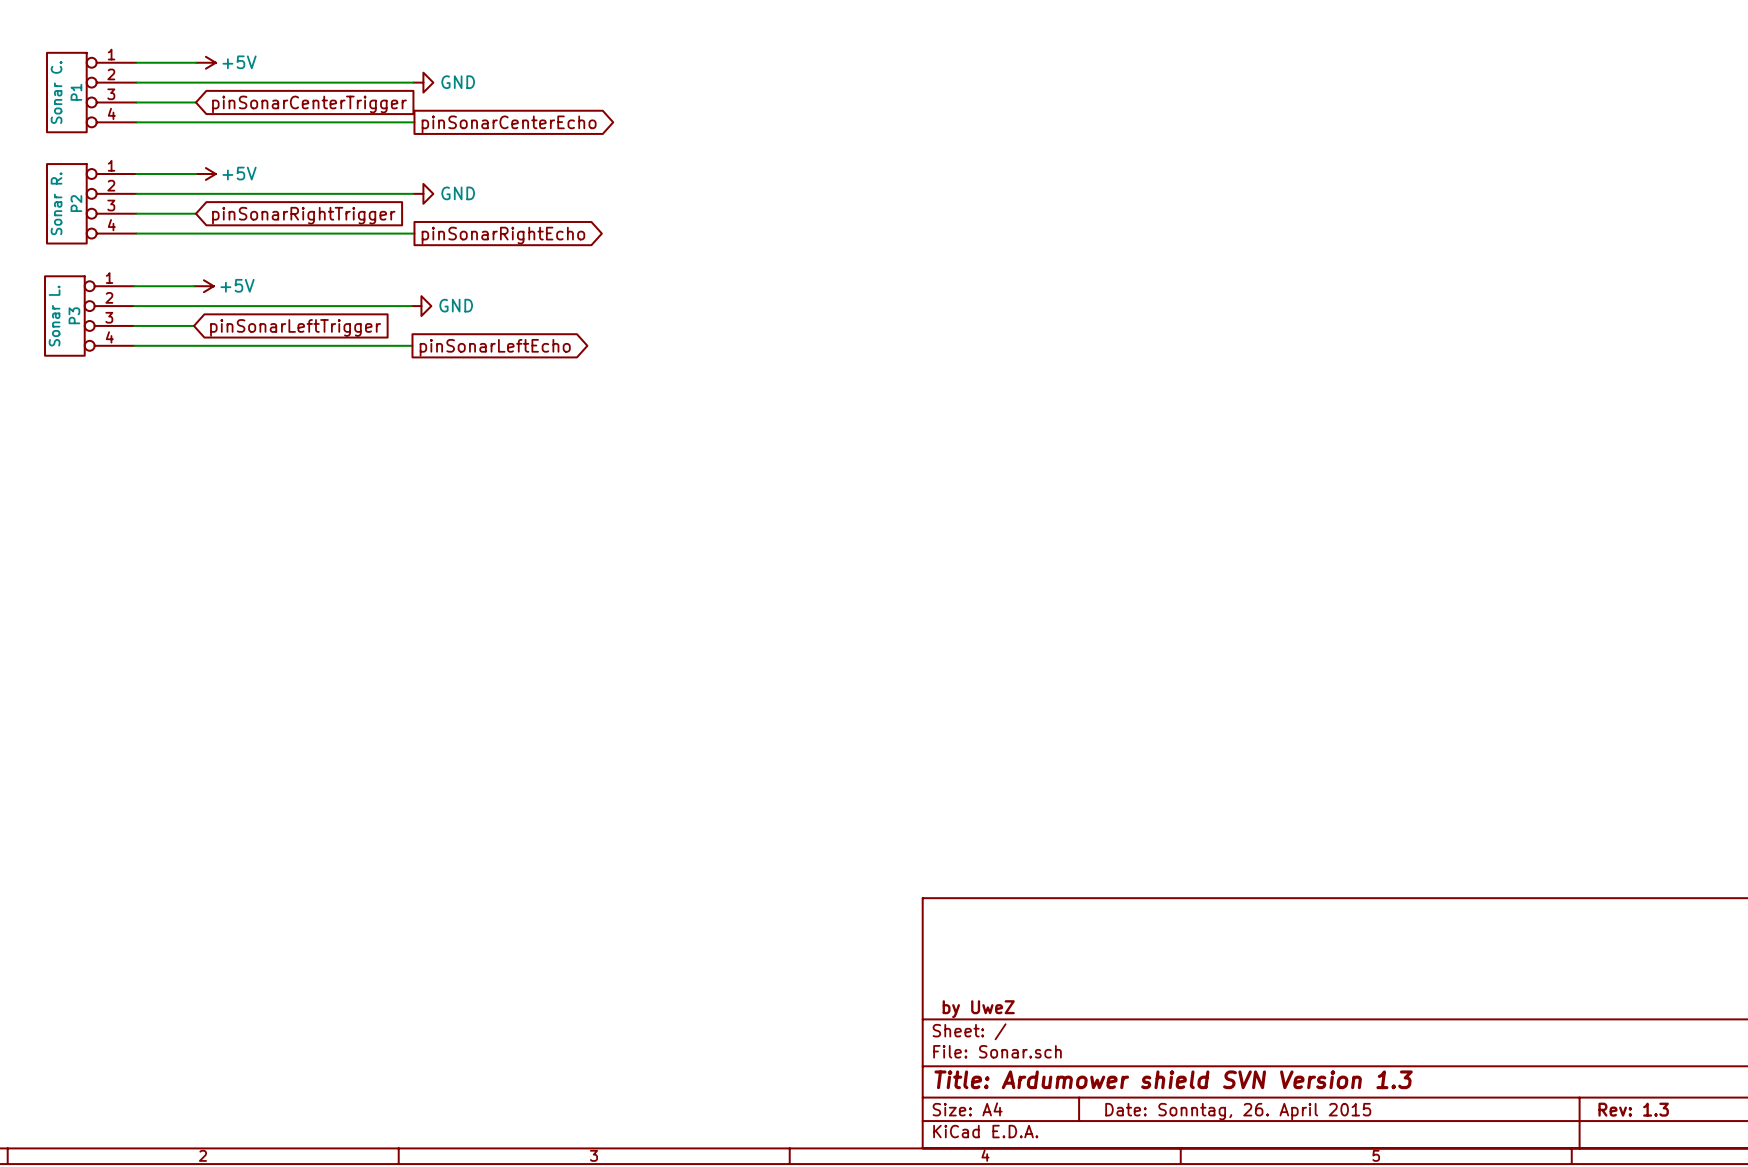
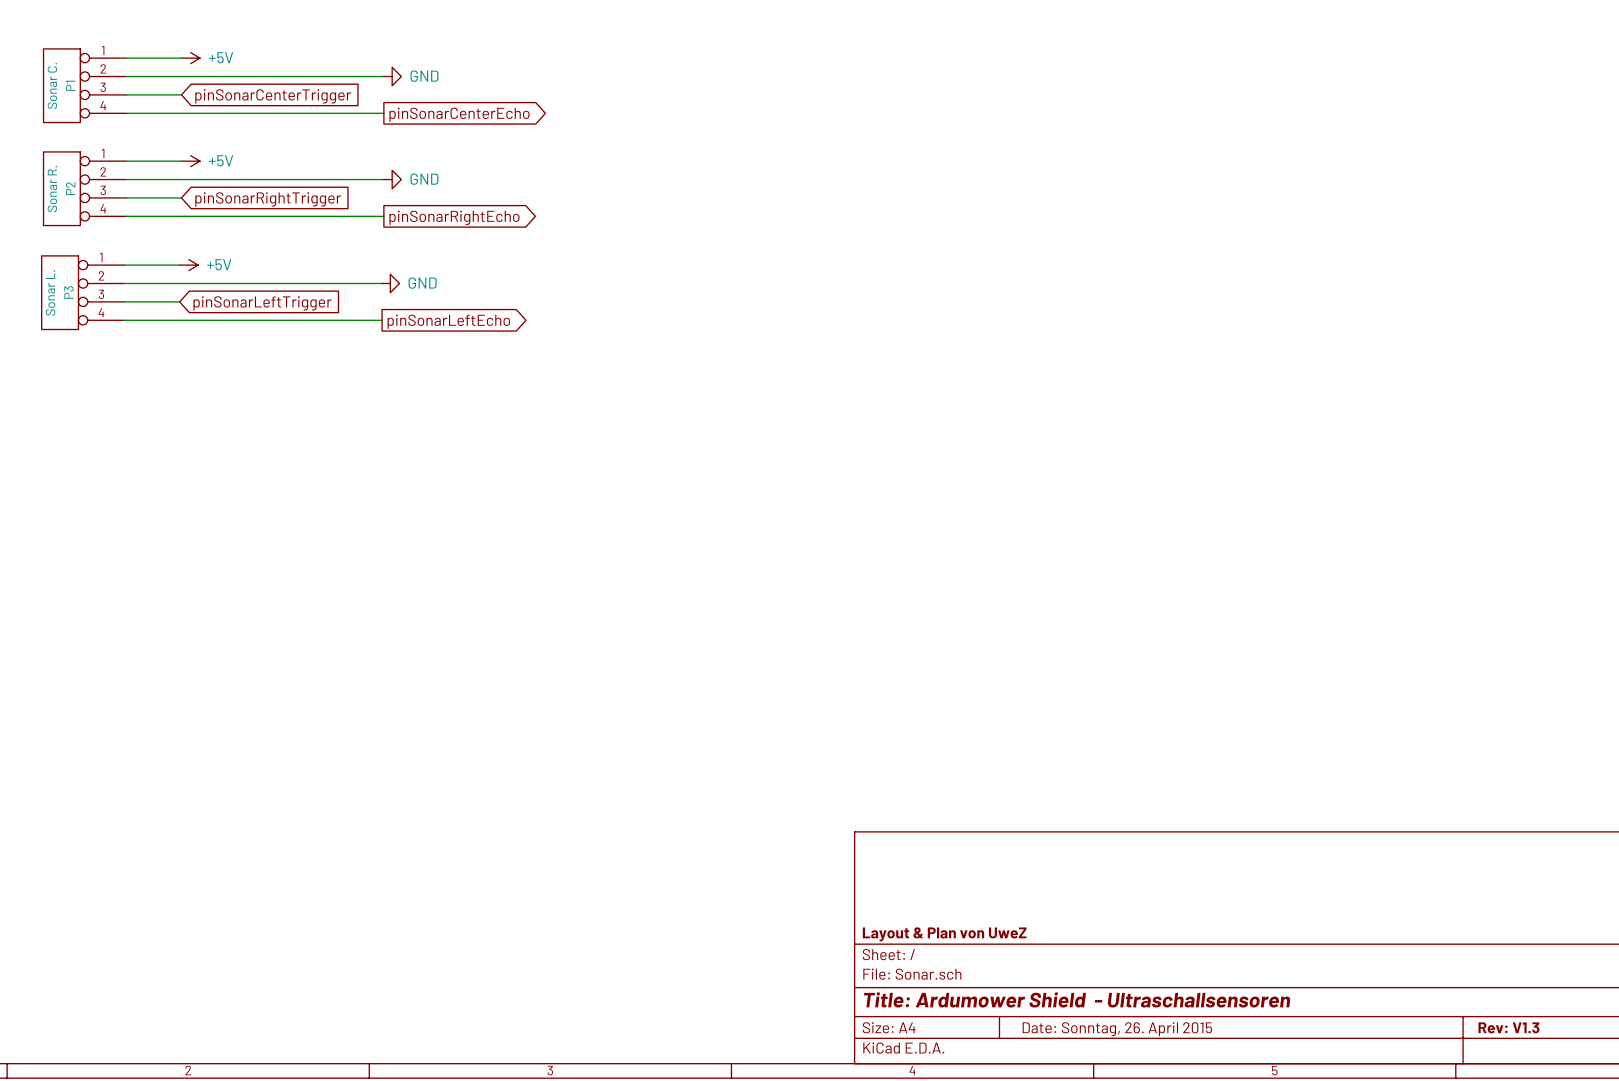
title block: by UweZ (978, 1009) -> Layout & Plan von UweZ (944, 934)
title block: Title: Ardumower shield SVN Version 1.3 (1173, 1079) -> Title: Ardumower Shield - Ultraschallsensoren (1077, 999)
title block: Rev: 1.3 (1633, 1109) -> Rev: V1.3 (1508, 1027)

